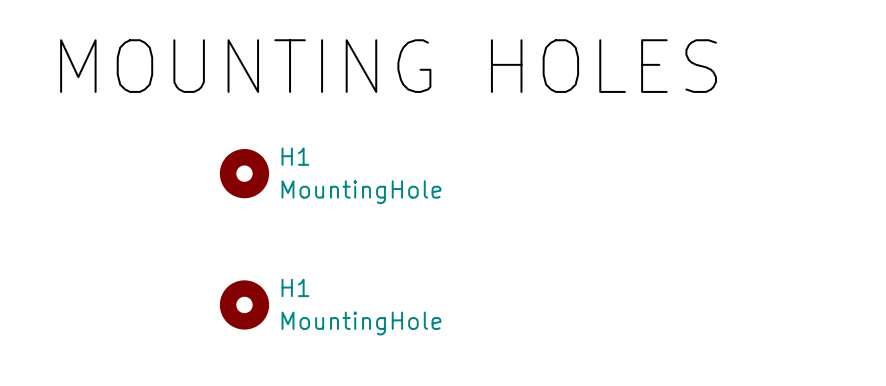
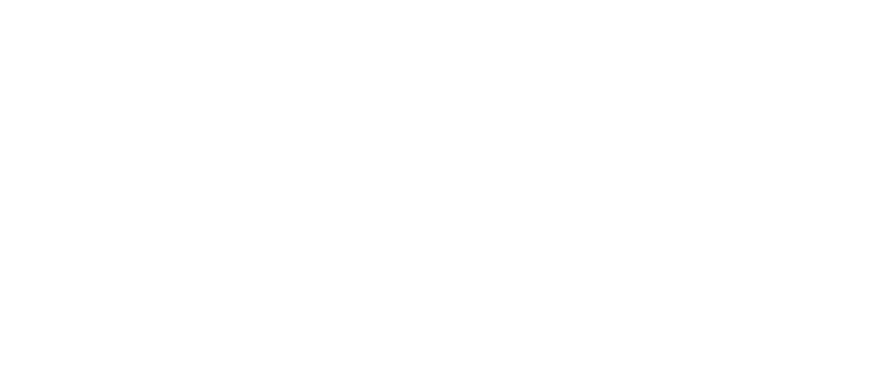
label: MOUNTING HOLES (388, 66) -> none
H1: MountingHole (244, 173) -> none
H1: MountingHole (244, 304) -> none

